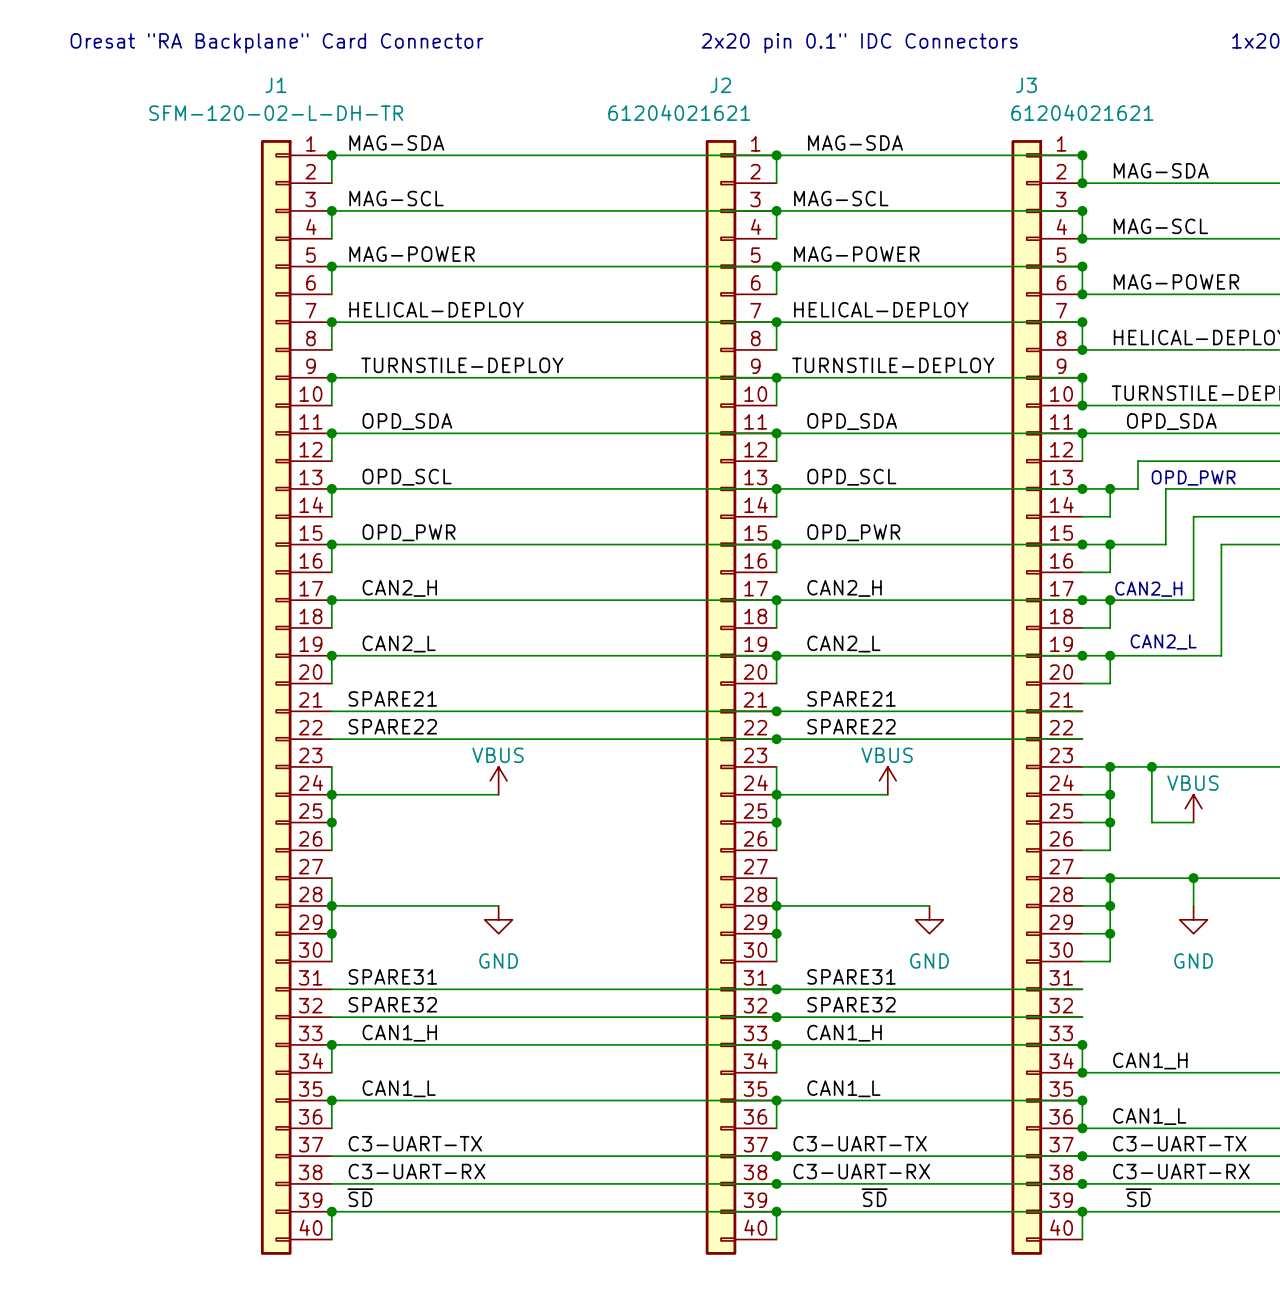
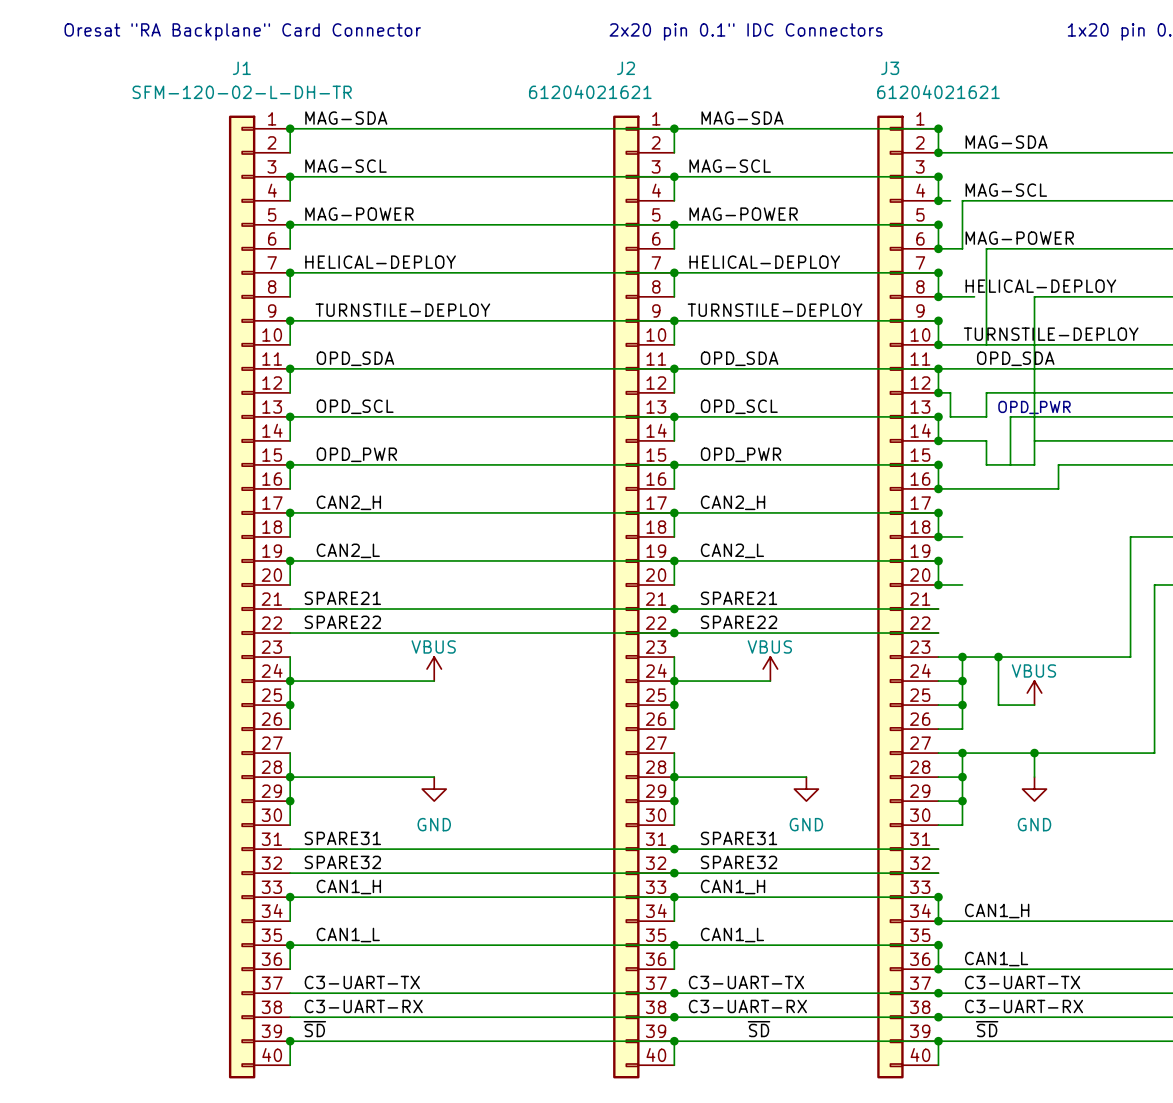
wire: (1096, 238) (1110, 238) -> (962, 248) (962, 200)
wire: (1110, 294) (1137, 294) -> (986, 344) (986, 248)
wire: (1124, 349) (1193, 349) -> (1034, 440) (1034, 296)
junction: none -> (938, 392)
wire: (1082, 488) (1096, 488) -> (938, 392) (950, 392) (950, 416)
wire: (1110, 488) (1110, 516) -> (938, 416) (938, 440)
junction: (1110, 488) -> none
junction: none -> (938, 440)
wire: (1082, 544) (1137, 544) -> (962, 440) (986, 440) (986, 464)
wire: (1110, 544) (1110, 572) -> (938, 464) (938, 488)
junction: (1110, 544) -> none
wire: (1193, 544) (1193, 600) (1082, 600) -> (1034, 464) (1010, 464)
junction: none -> (938, 488)
wire: (1221, 572) (1221, 655) (1082, 655) -> (1058, 488) (962, 488)
text: CAN2_H (1148, 589) -> none
wire: (1110, 600) (1110, 627) -> (938, 512) (938, 536)
junction: (1110, 600) -> none
junction: none -> (938, 536)
text: CAN2_L (1163, 642) -> none
wire: (1110, 655) (1110, 683) -> (938, 560) (938, 584)
junction: (1110, 655) -> none
junction: none -> (938, 584)

